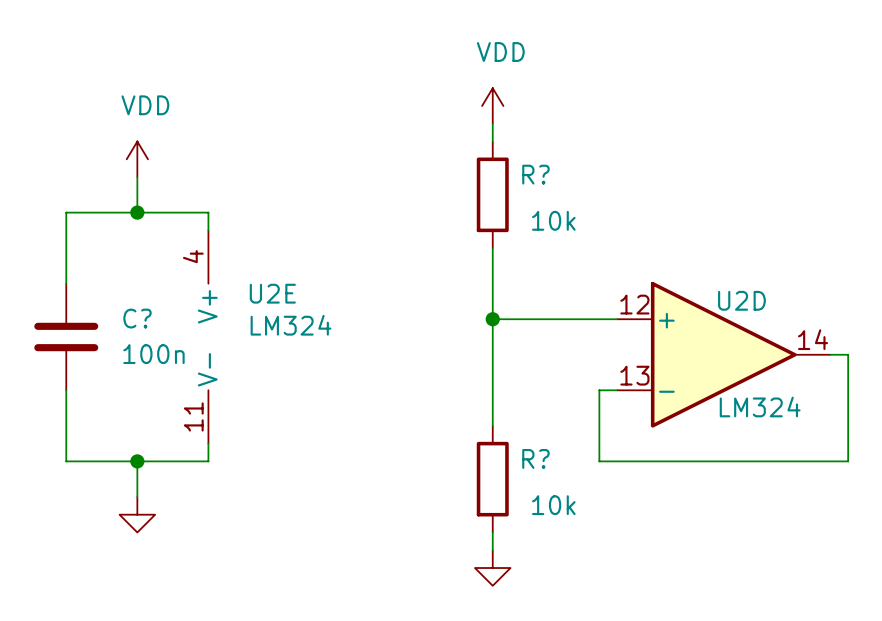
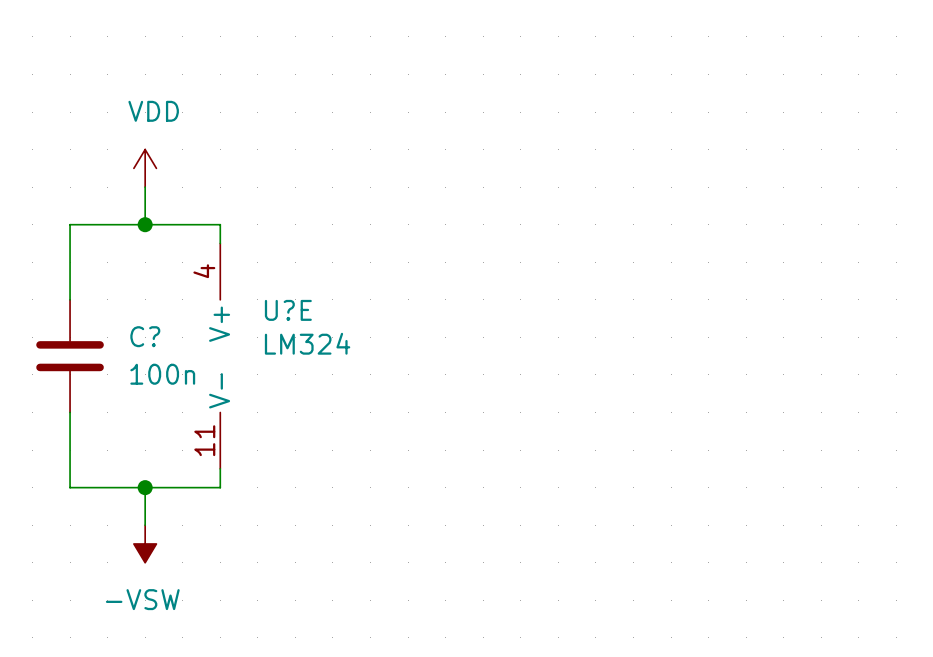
power symbol: VDD (492, 105) -> none
wire: (492, 123) (492, 141) -> none
R?: 10k (492, 194) -> none
wire: (492, 248) (492, 425) -> none
U2E name: U2E (272, 293) -> U?E (288, 310)
wire: (492, 319) (617, 319) -> none
junction: (492, 319) -> none
U2D: LM324 (723, 354) -> none
wire: (830, 354) (848, 354) (848, 461) (599, 461) (599, 390) (617, 390) -> none
R?: 10k (492, 479) -> none
power symbol shape: [119, 496, 156, 533] -> [133, 525, 157, 563]
wire: (492, 532) (492, 550) -> none
power symbol text: none -> -VSW (142, 599)
power symbol: (492, 568) -> none

